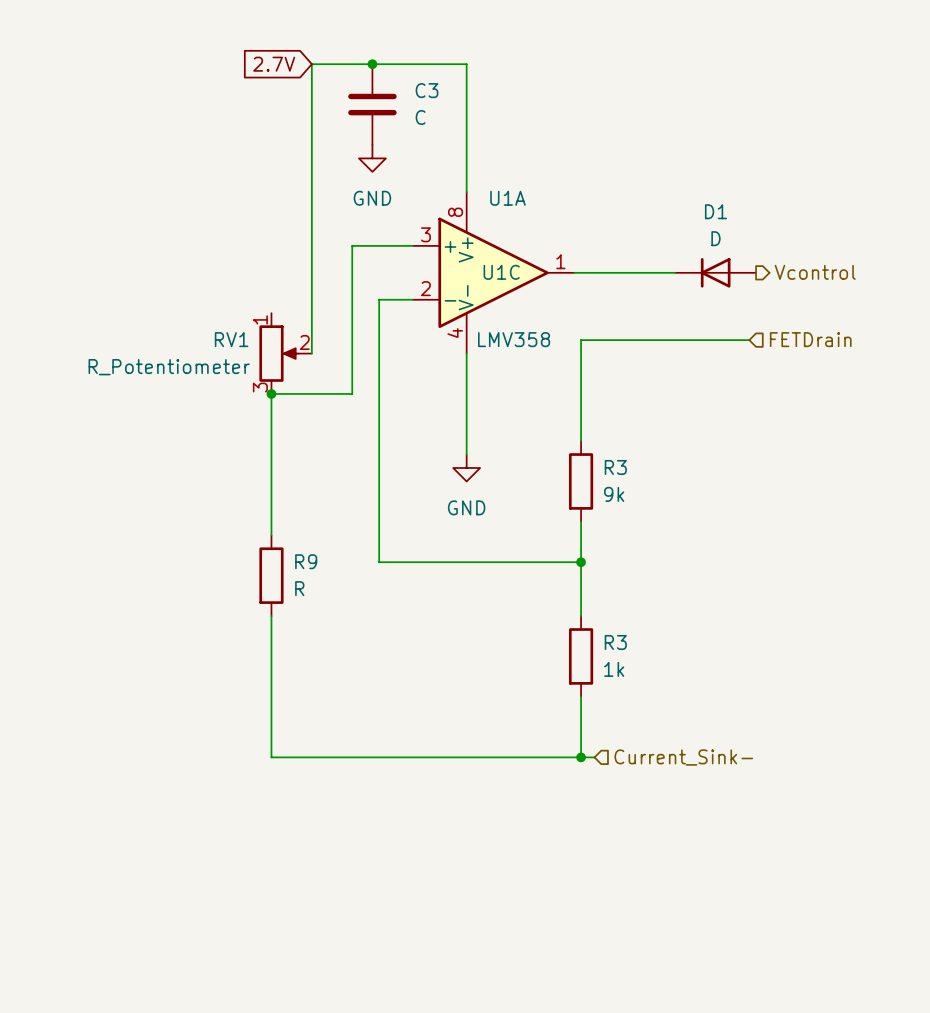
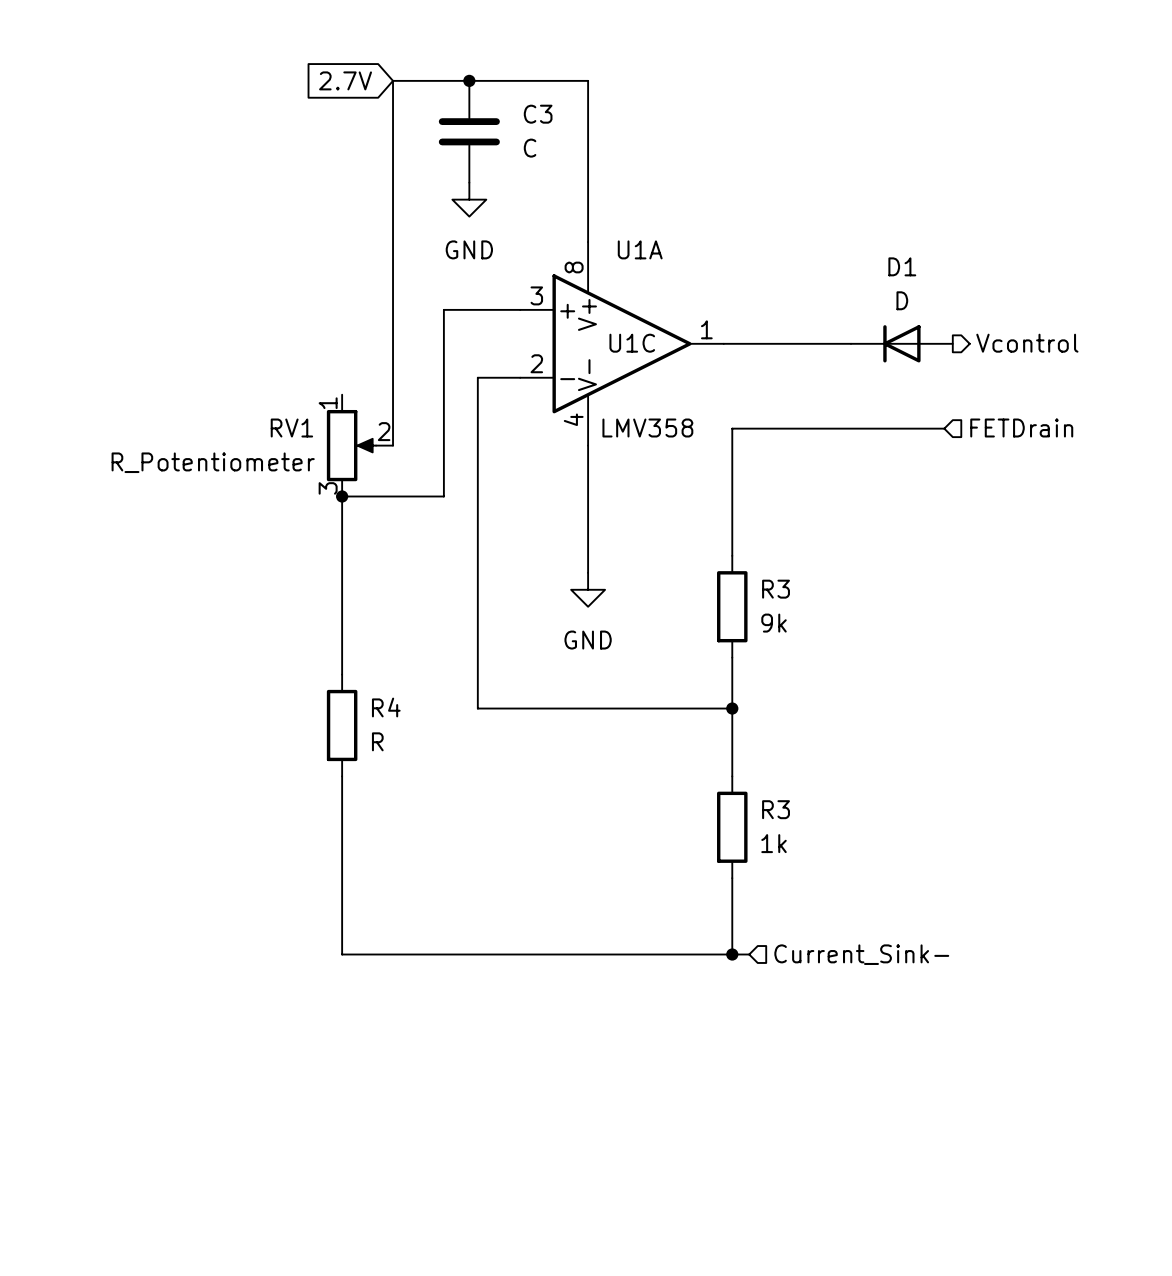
R9 name: R9 (306, 561) -> R4 (386, 707)

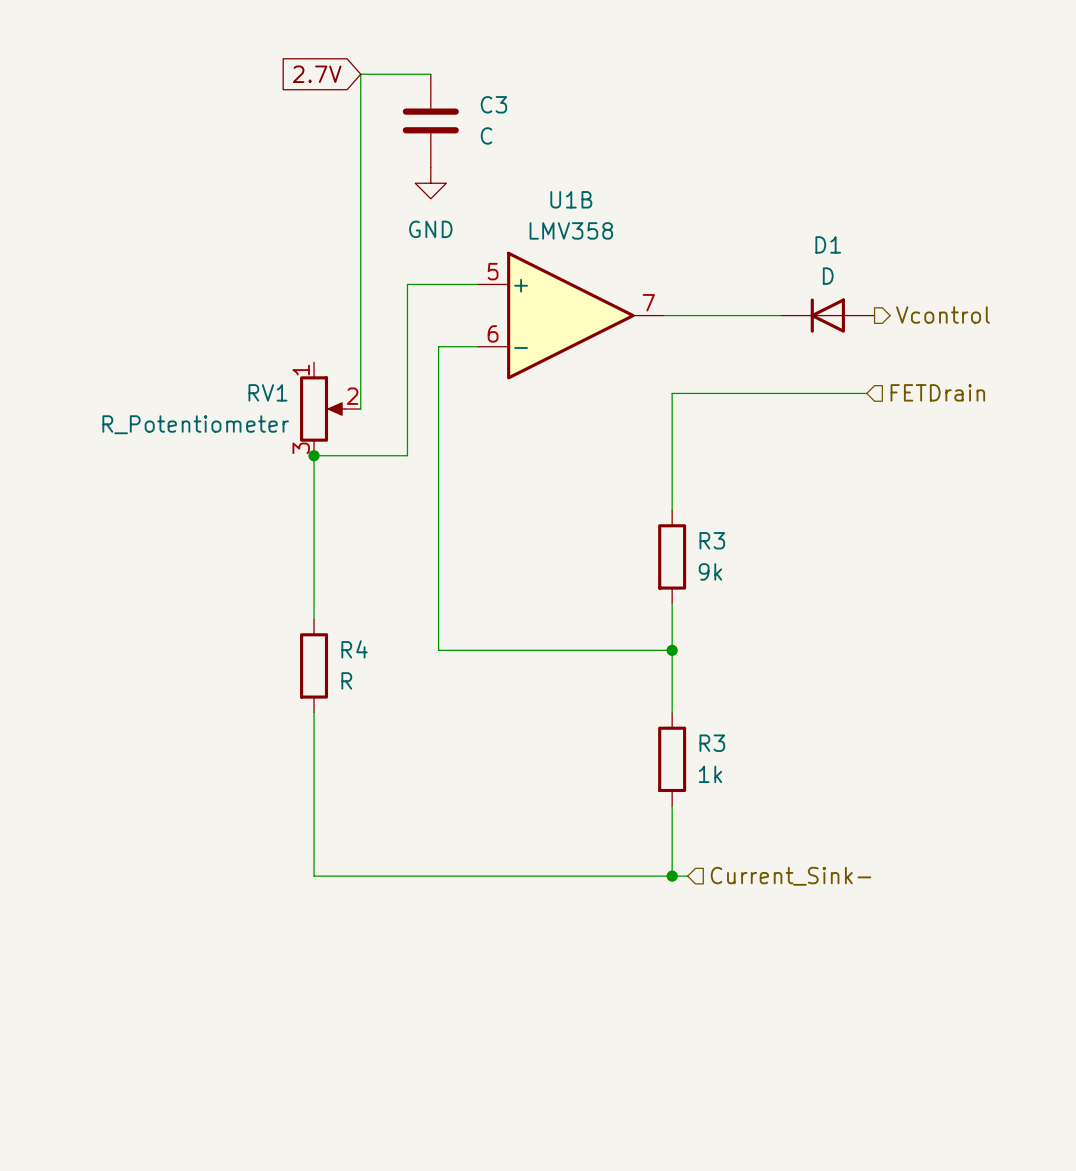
wire: (469, 80) (588, 80) (588, 242) -> none
junction: (469, 80) -> none
U1A name: U1A (640, 249) -> U1B (571, 199)
U1A pin number: 3 (536, 295) -> 5 (493, 271)
U1A pin number: 1 (706, 329) -> 7 (648, 302)
U1C: (588, 343) -> none
U1A pin number: 2 (536, 363) -> 6 (493, 333)
U1A value position: LMV358 (647, 428) -> LMV358 (571, 230)
wire: (588, 445) (588, 572) -> none
power symbol: GND (588, 589) -> none

